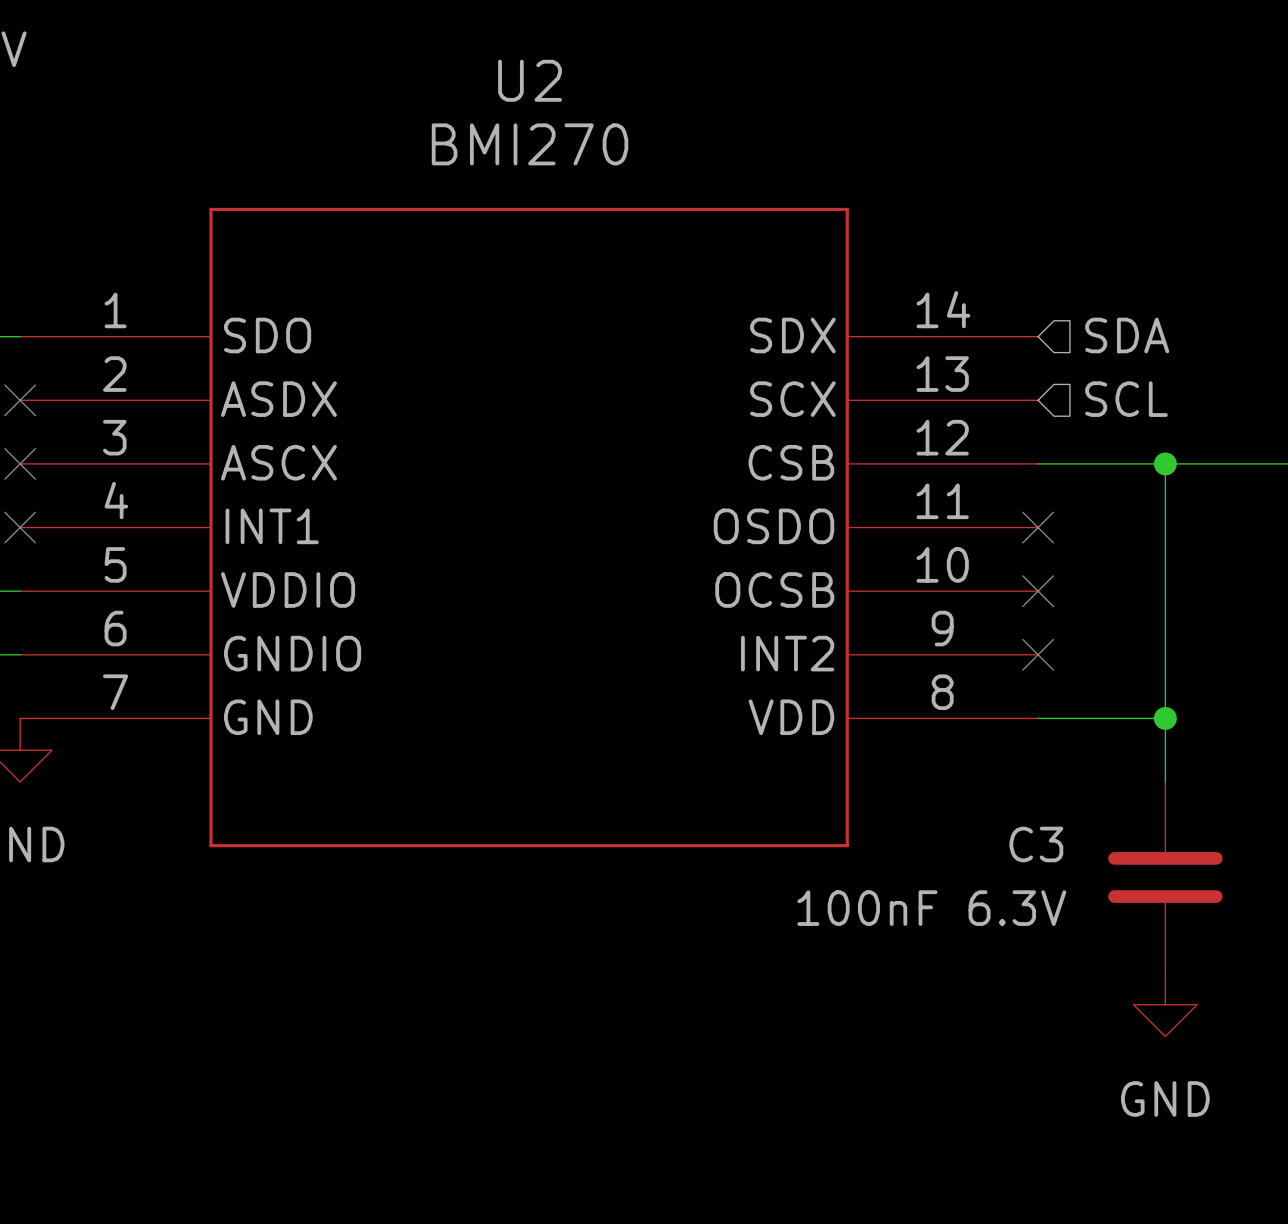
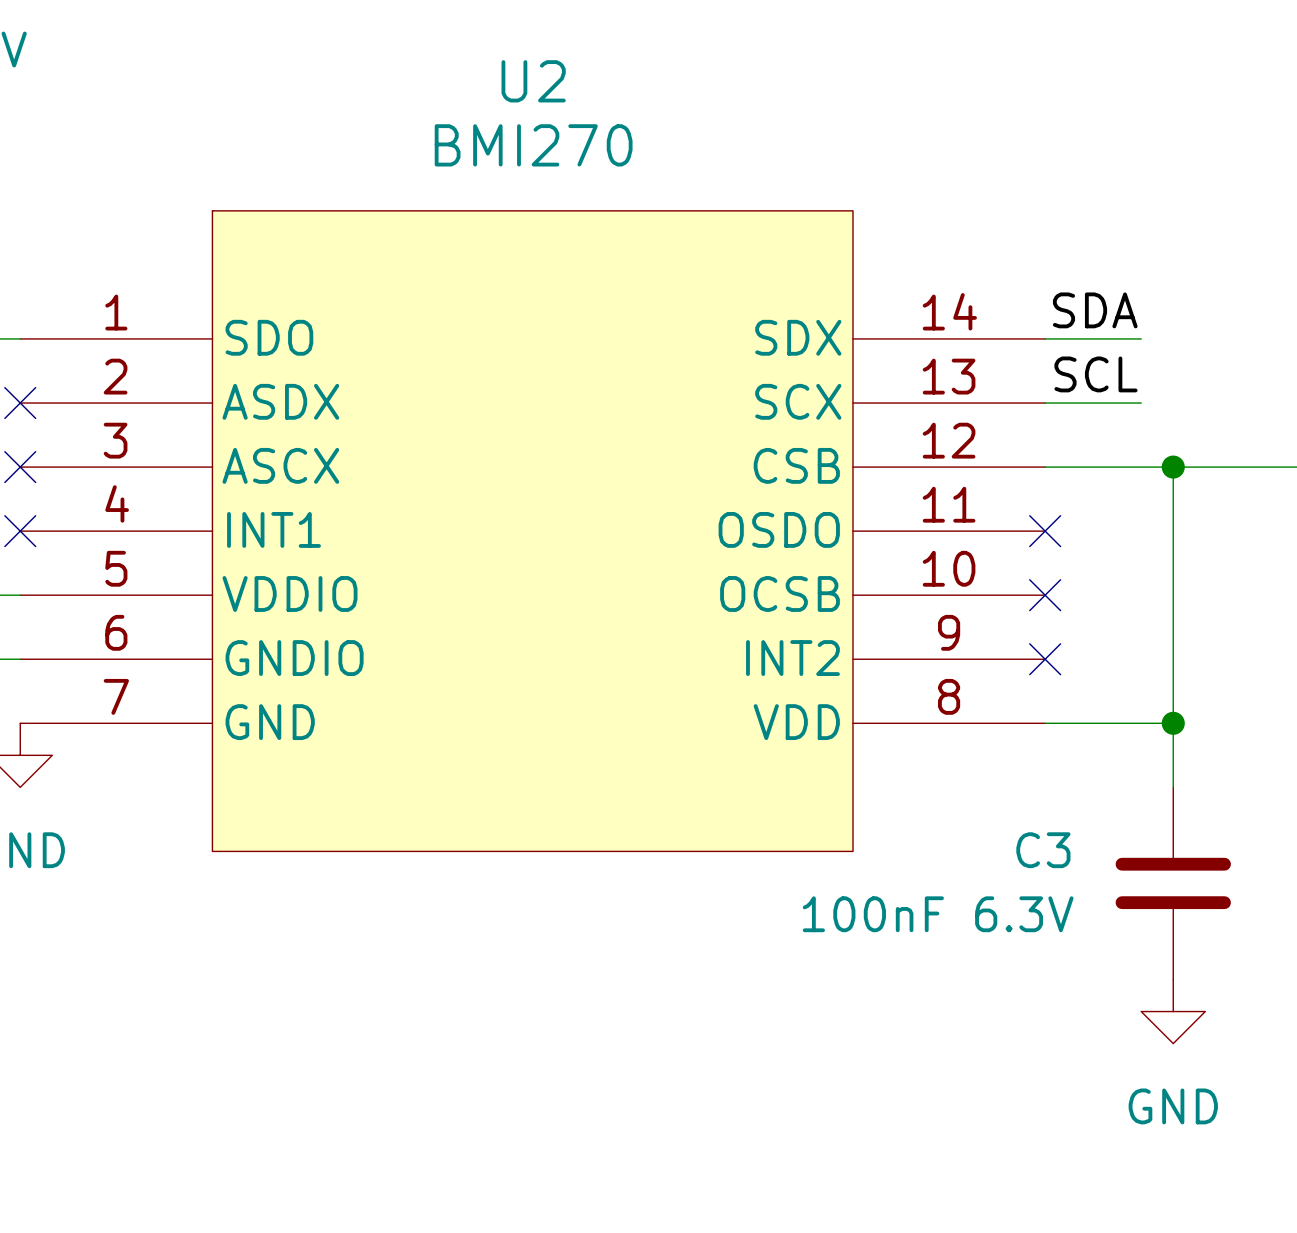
U2 symbol: [20, 207, 1039, 848] -> [20, 210, 1046, 852]
label: none -> SDA (1095, 310)
hierarchical label: SDA (1127, 335) -> none
wire: none -> (1045, 338) (1141, 338)
label: none -> SCL (1096, 374)
hierarchical label: SCL (1126, 399) -> none
wire: none -> (1045, 403) (1141, 403)

